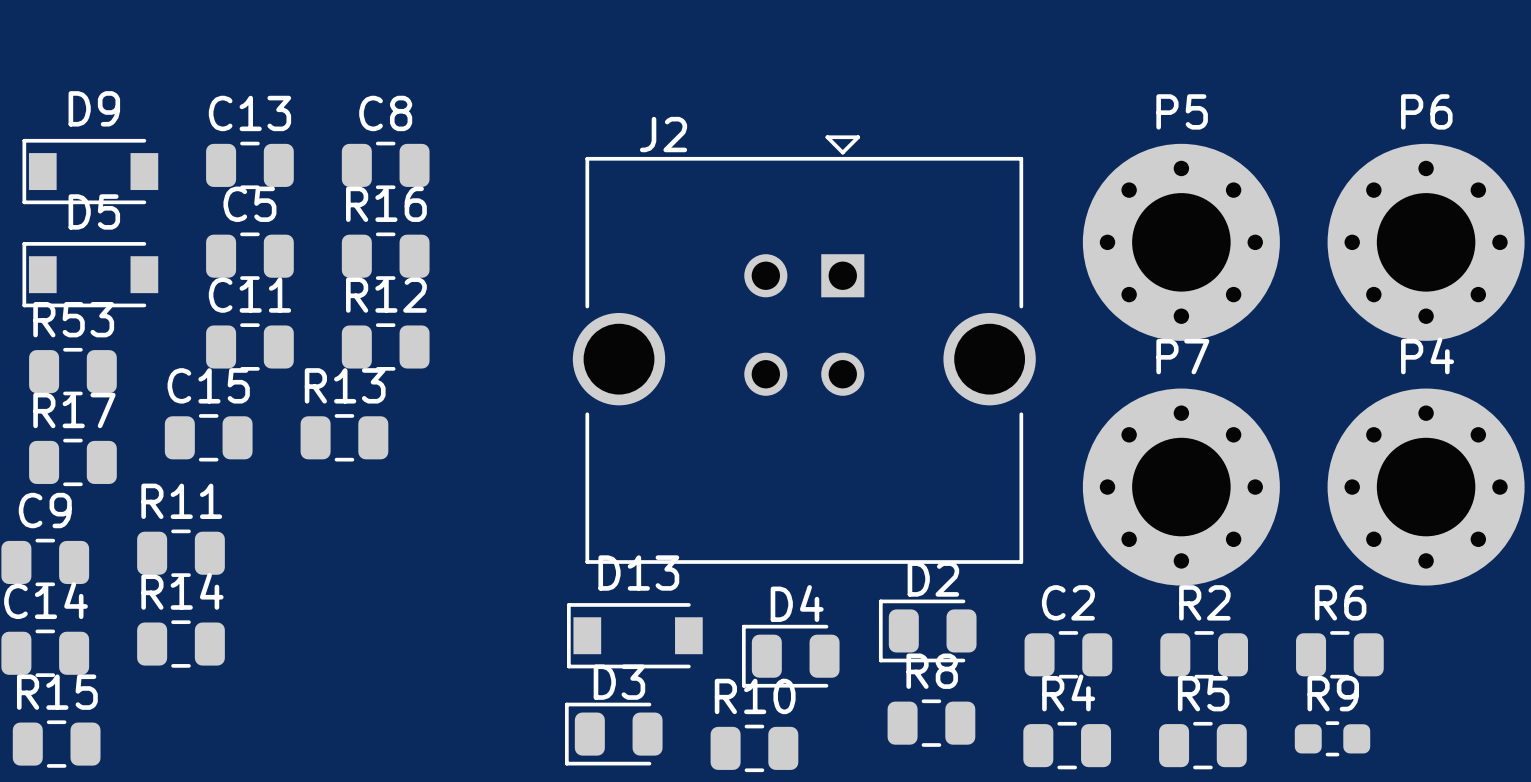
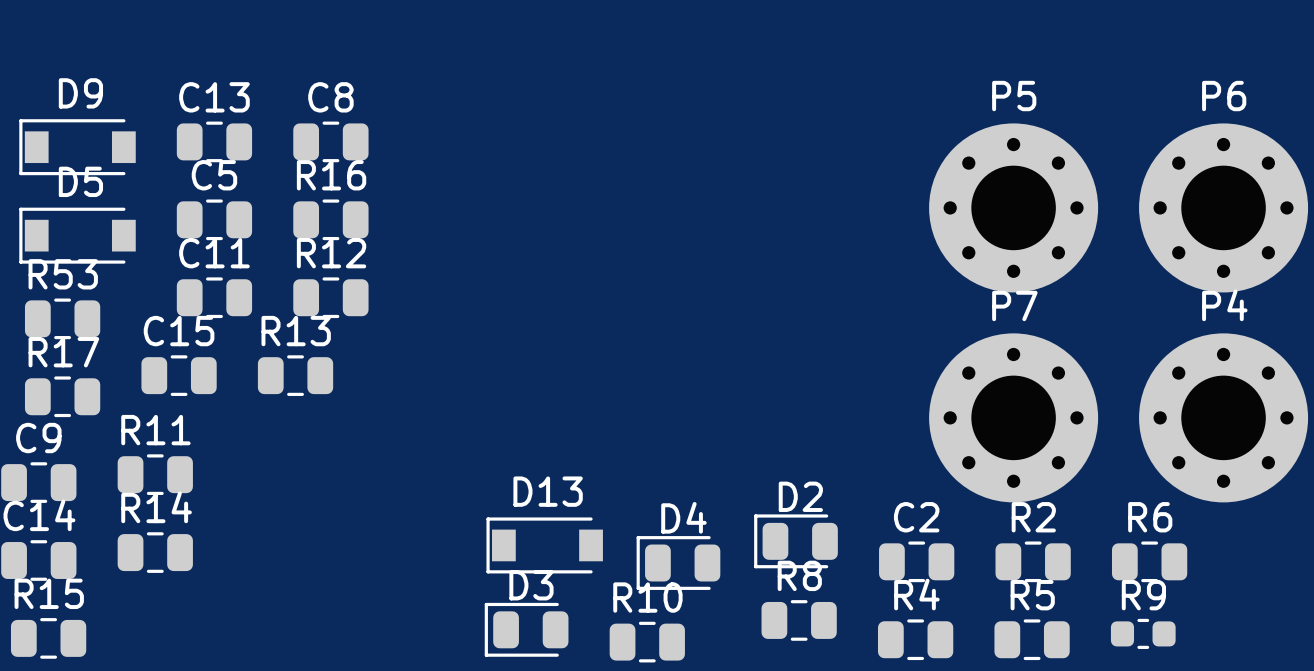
J2: (804, 349) -> none

